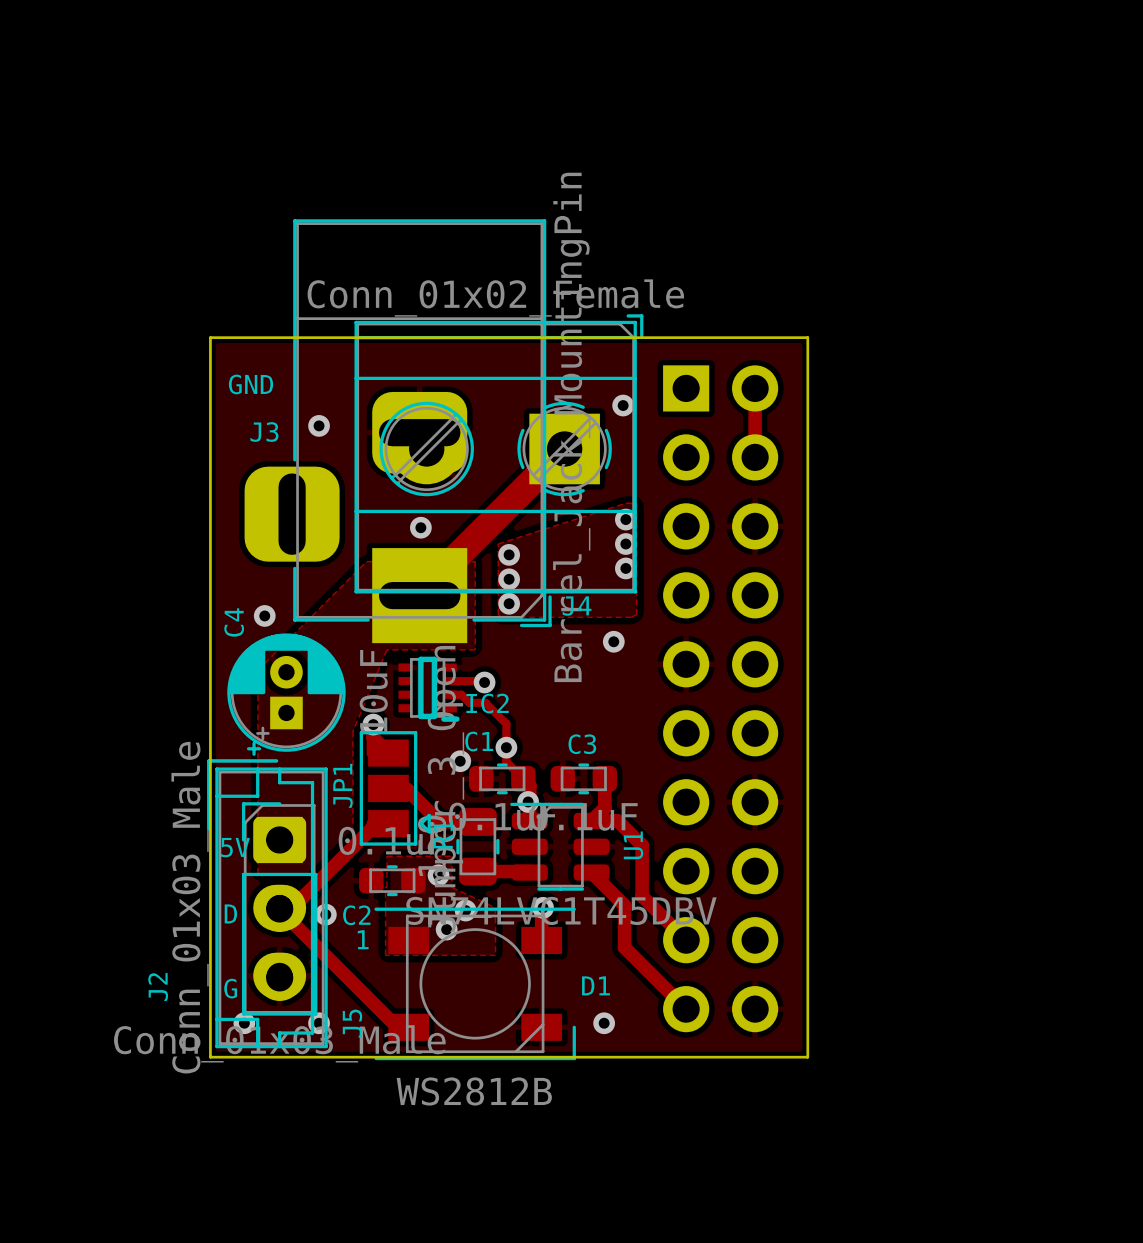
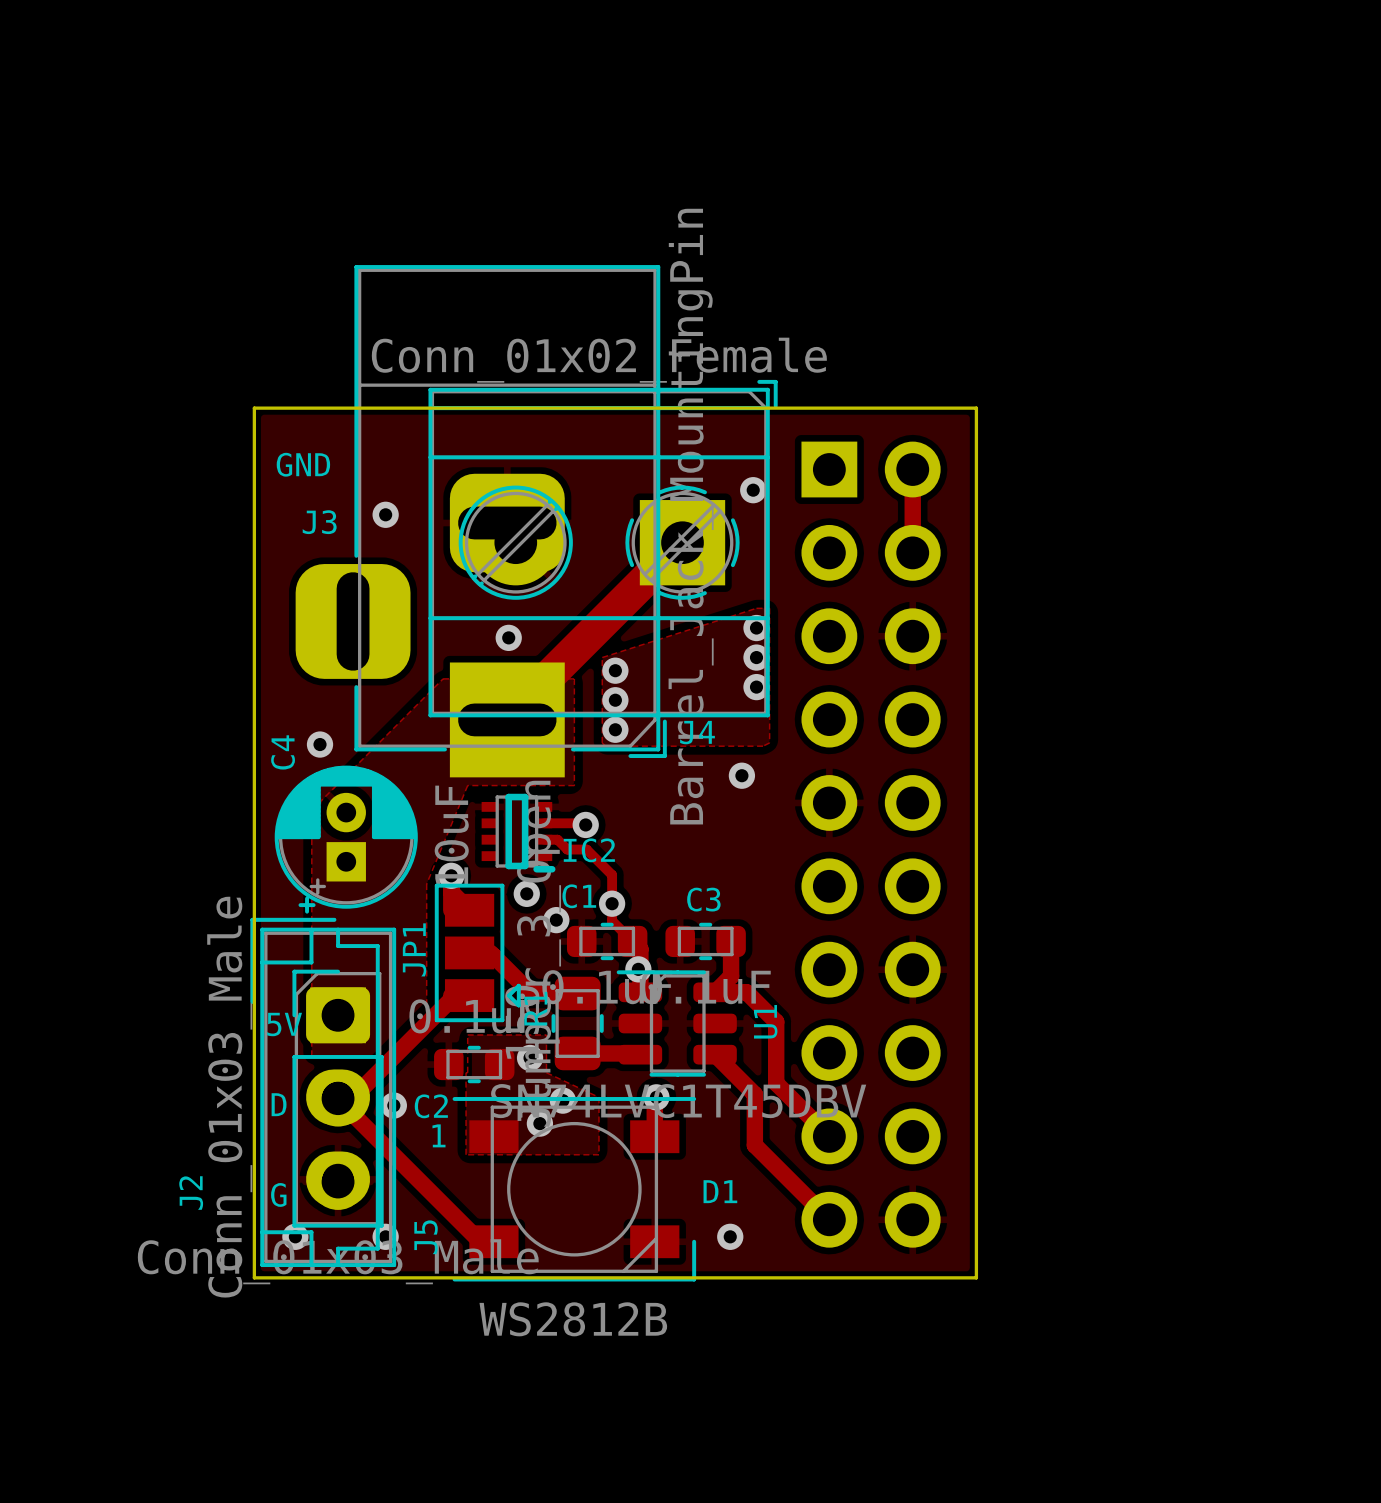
via: none -> (526, 893)

